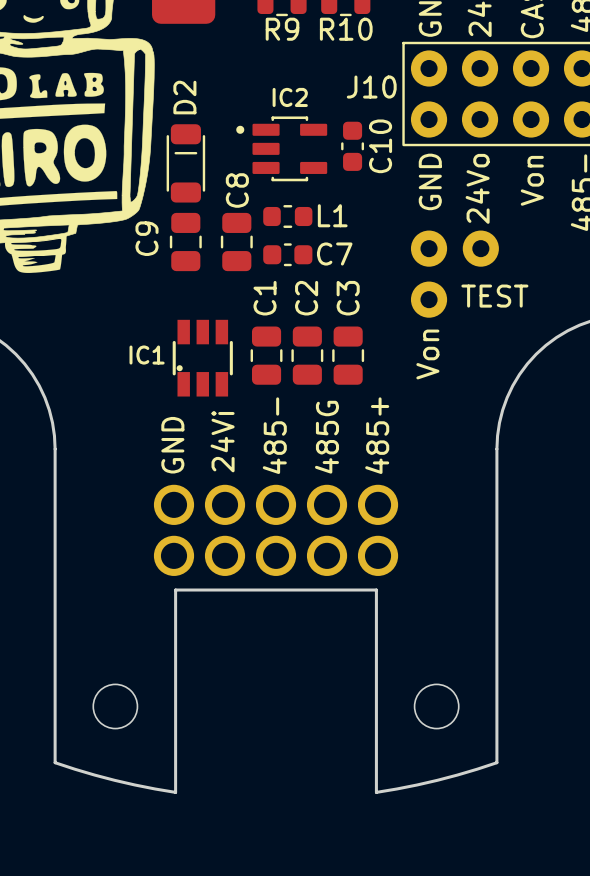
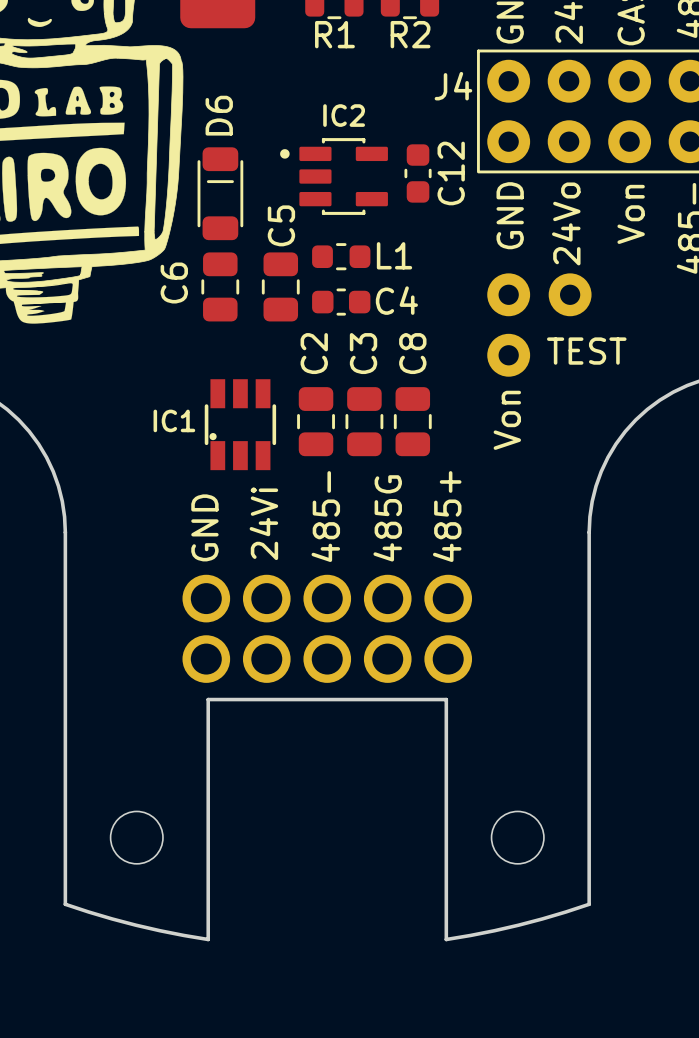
R9 name: R9 (282, 29) -> R1 (334, 34)
R10 name: R10 (346, 29) -> R2 (410, 34)
J10 name: J10 (371, 87) -> J4 (453, 86)
D2 name: D2 (184, 97) -> D6 (219, 115)
C10 name: C10 (380, 146) -> C12 (451, 173)
C8 name: C8 (237, 190) -> C5 (281, 225)
C9 name: C9 (146, 238) -> C6 (174, 283)
C7 name: C7 (334, 254) -> C4 (396, 300)
C1 name: C1 (265, 298) -> C2 (314, 353)
C2 name: C2 (306, 298) -> C3 (363, 353)
C3 name: C3 (348, 298) -> C8 (412, 353)

